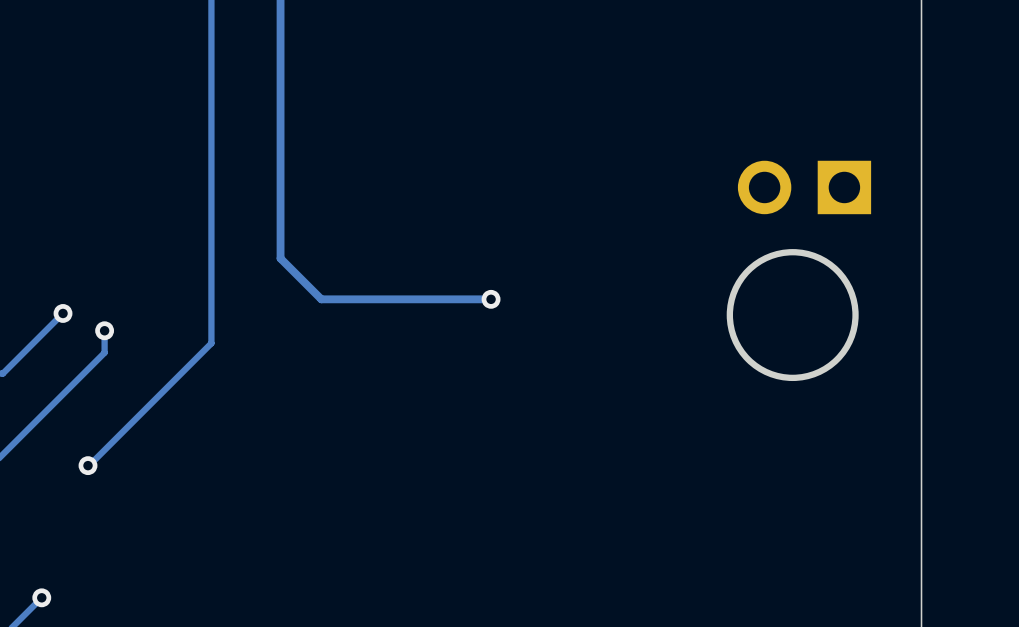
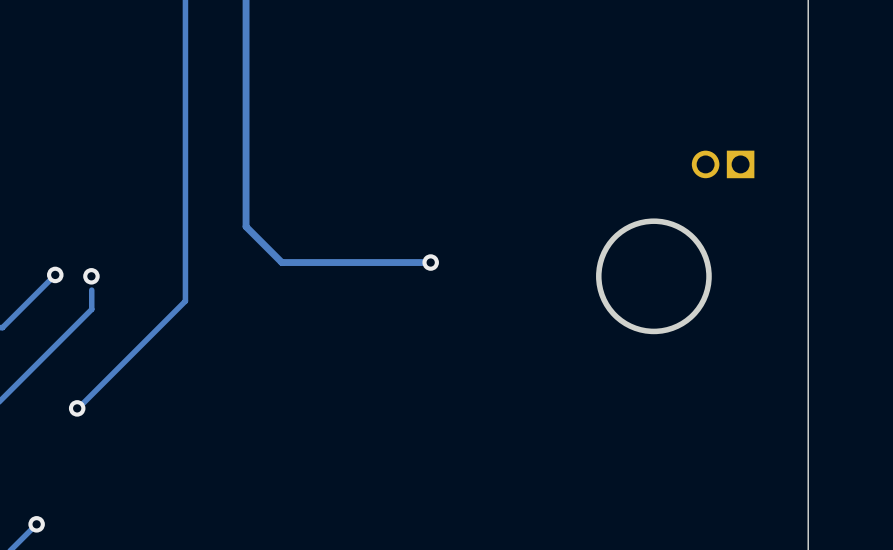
part footprint: [737, 160, 872, 215] -> [691, 150, 755, 179]
round board edge position: (792, 315) -> (653, 276)
via position: (104, 330) -> (91, 276)

